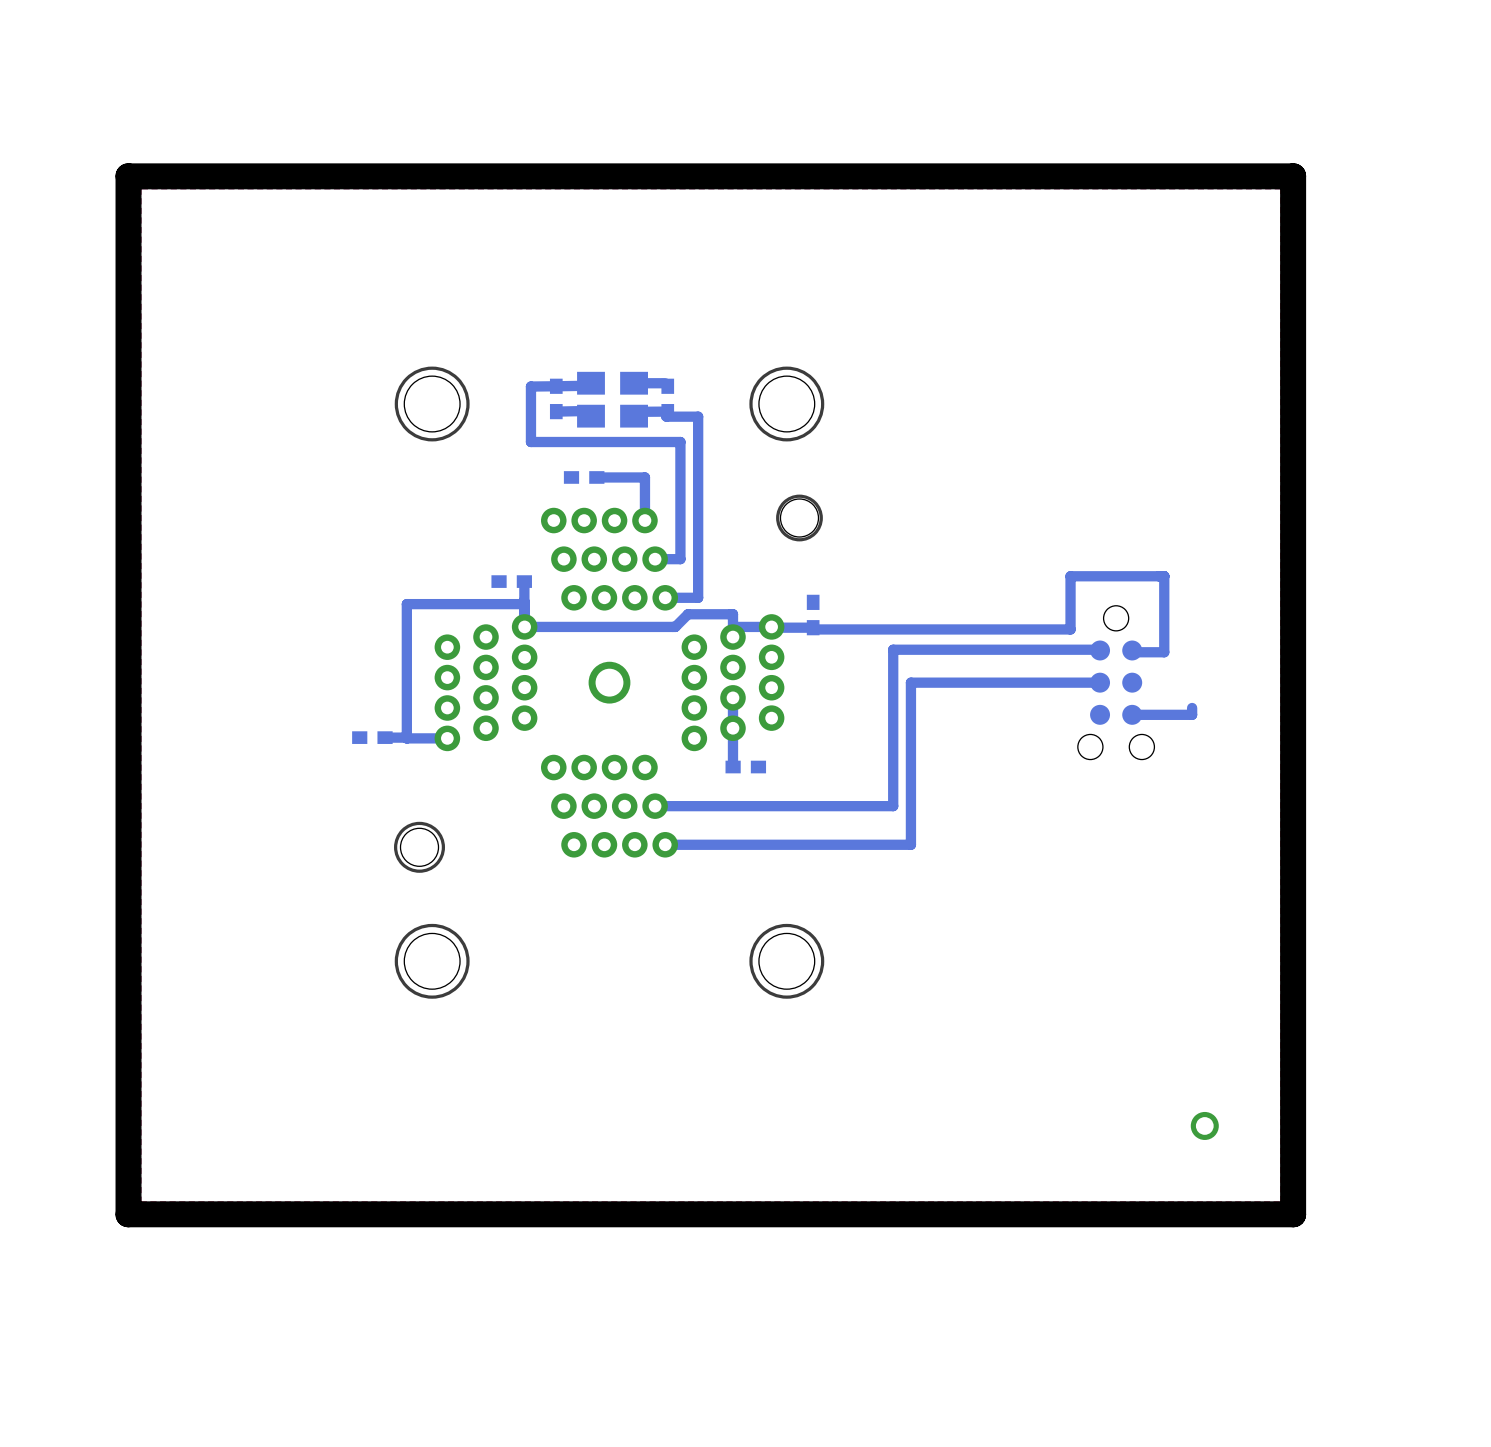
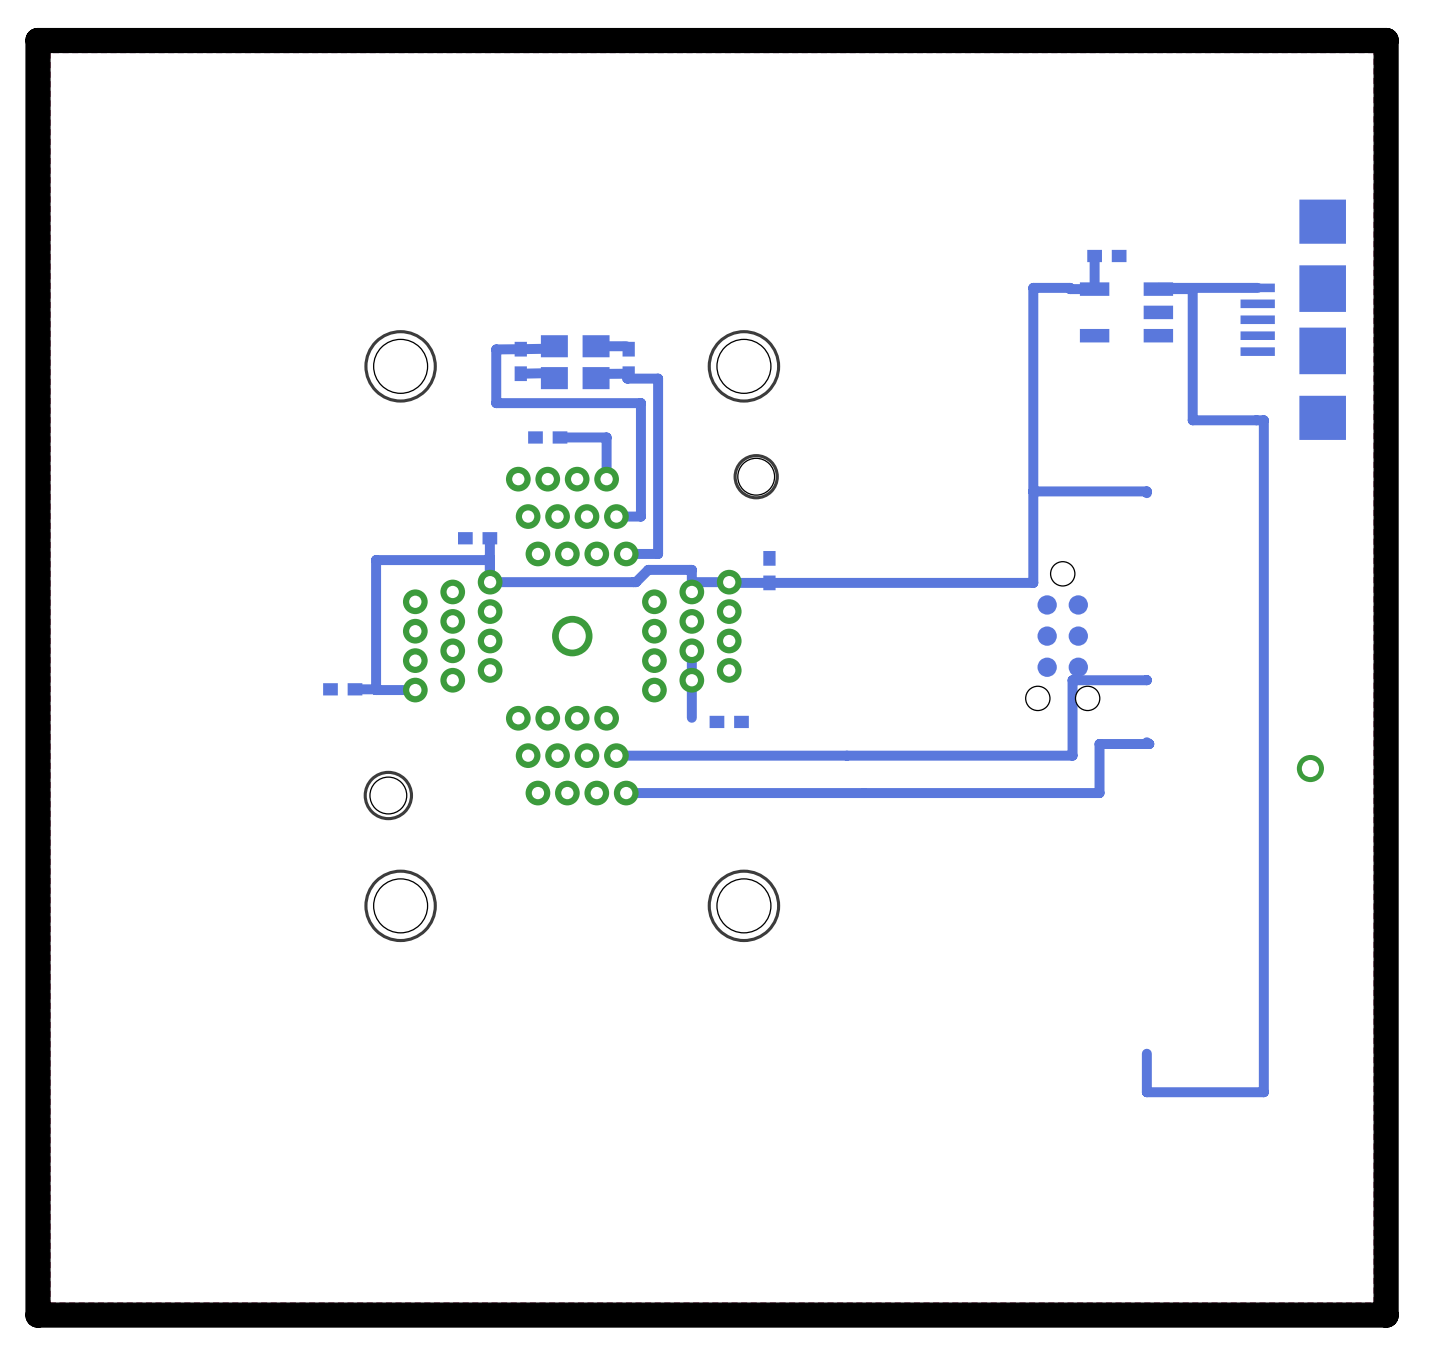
board edge: (128, 176) (1293, 176) (1293, 1214) (128, 1214) (128, 176) -> (49, 52) (49, 1303) (1374, 1303) (1374, 52) (49, 52)
board edge: (140, 188) (1280, 188) (1280, 1201) (140, 1201) (140, 188) -> (37, 40) (37, 1315) (1386, 1315) (1386, 40) (37, 40)
part: none -> (1106, 256)
bottom track: none -> (1257, 287) (1158, 289) (1192, 289) (1192, 420) (1263, 420) (1263, 1092) (1146, 1092) (1146, 1053)
part: none -> (1126, 312)
part: none -> (1293, 319)
bottom track: none -> (1033, 491) (1146, 491) (1146, 493)
bottom track: (813, 627) (813, 629) (1070, 629) (1070, 576) (1164, 576) (1164, 652) (1132, 652) (1132, 650) -> (769, 582) (1033, 582) (1033, 287) (1094, 289) (1094, 256)
bottom track: (1100, 650) (893, 649) (893, 806) -> (1146, 680) (1072, 680) (1072, 755) (846, 755)
bottom track: (1100, 682) (910, 682) (910, 844) -> (1146, 742) (1149, 744) (1099, 744) (1099, 793) (864, 793)
bottom track: (1192, 707) (1192, 714) (1132, 714) -> none
part position: (745, 767) -> (729, 721)
via: none -> (1310, 768)
via: (1204, 1125) -> none

